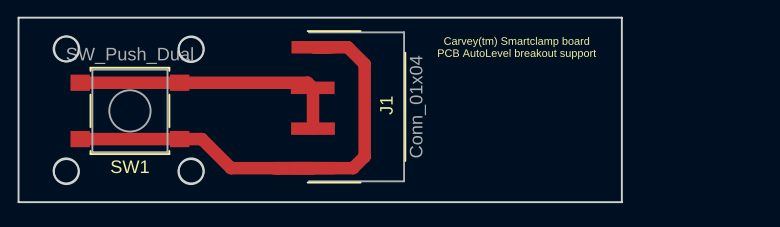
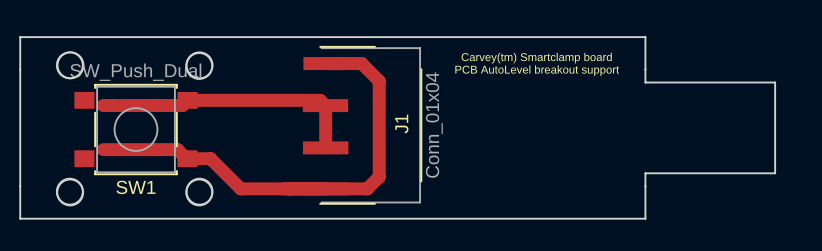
board edge: (18, 17) (18, 202) (621, 202) (621, 17) (18, 17) -> (20, 37) (20, 218) (645, 218) (645, 173) (775, 173) (775, 82) (645, 82) (645, 37) (20, 37)
track: (80, 82) (179, 82) -> (103, 105) (182, 105) (187, 100)
track: (80, 139) (178, 139) -> (103, 149) (177, 149) (186, 158)

